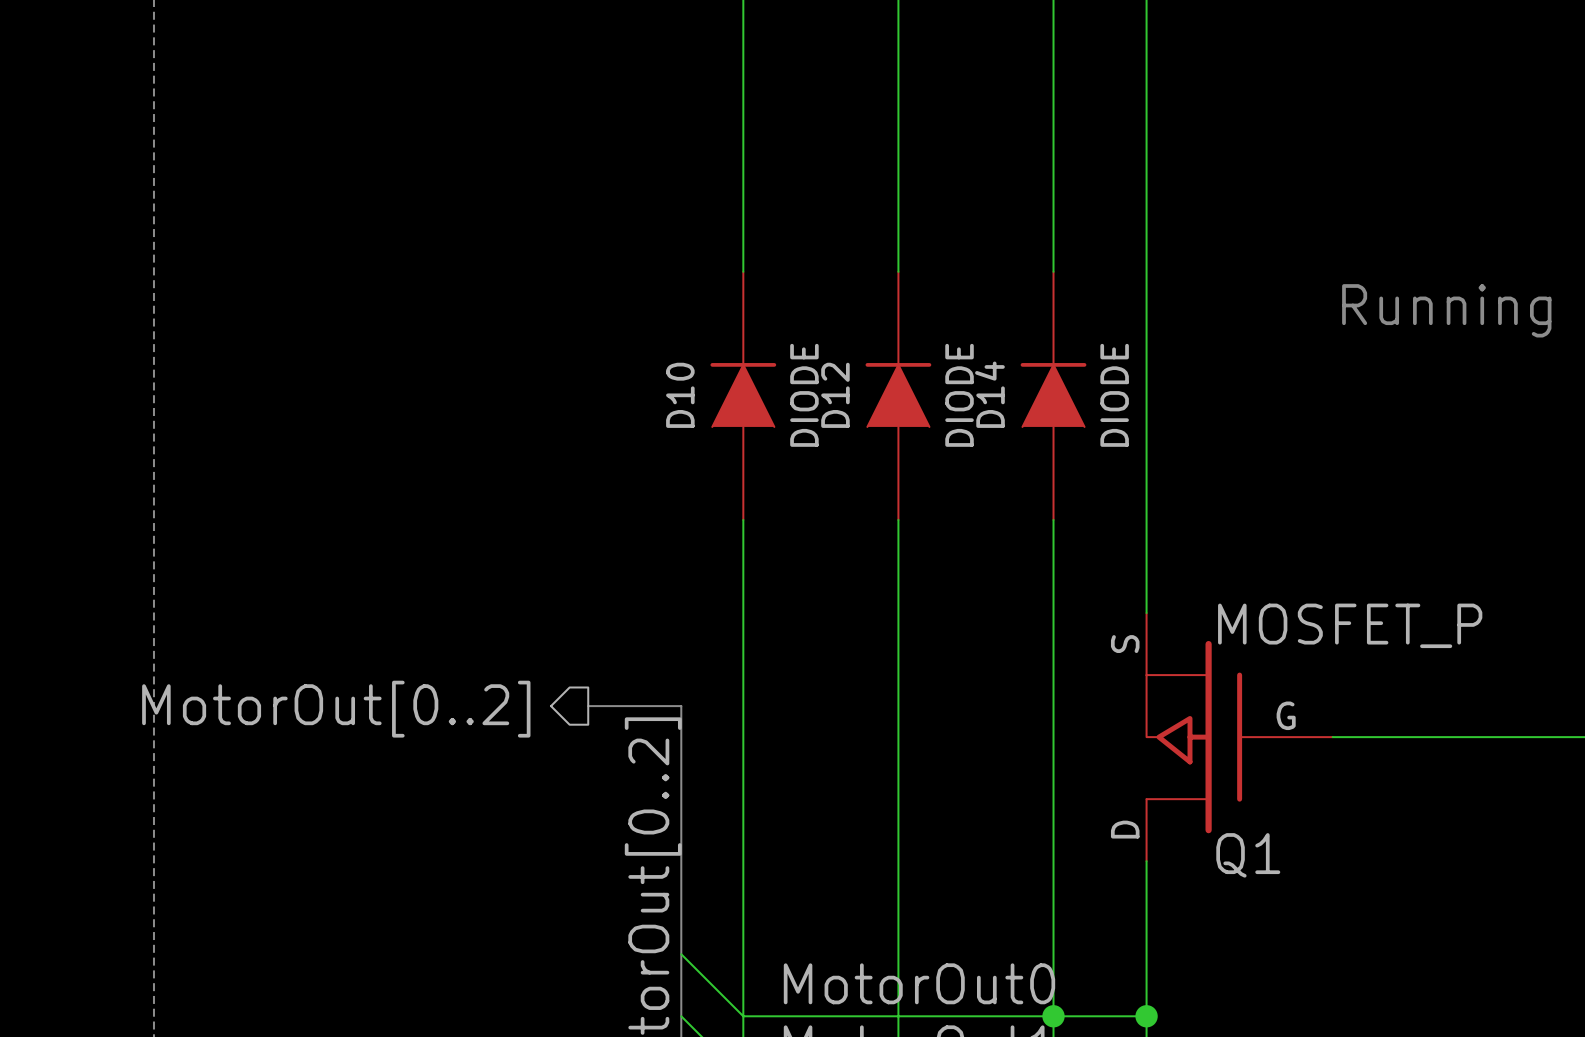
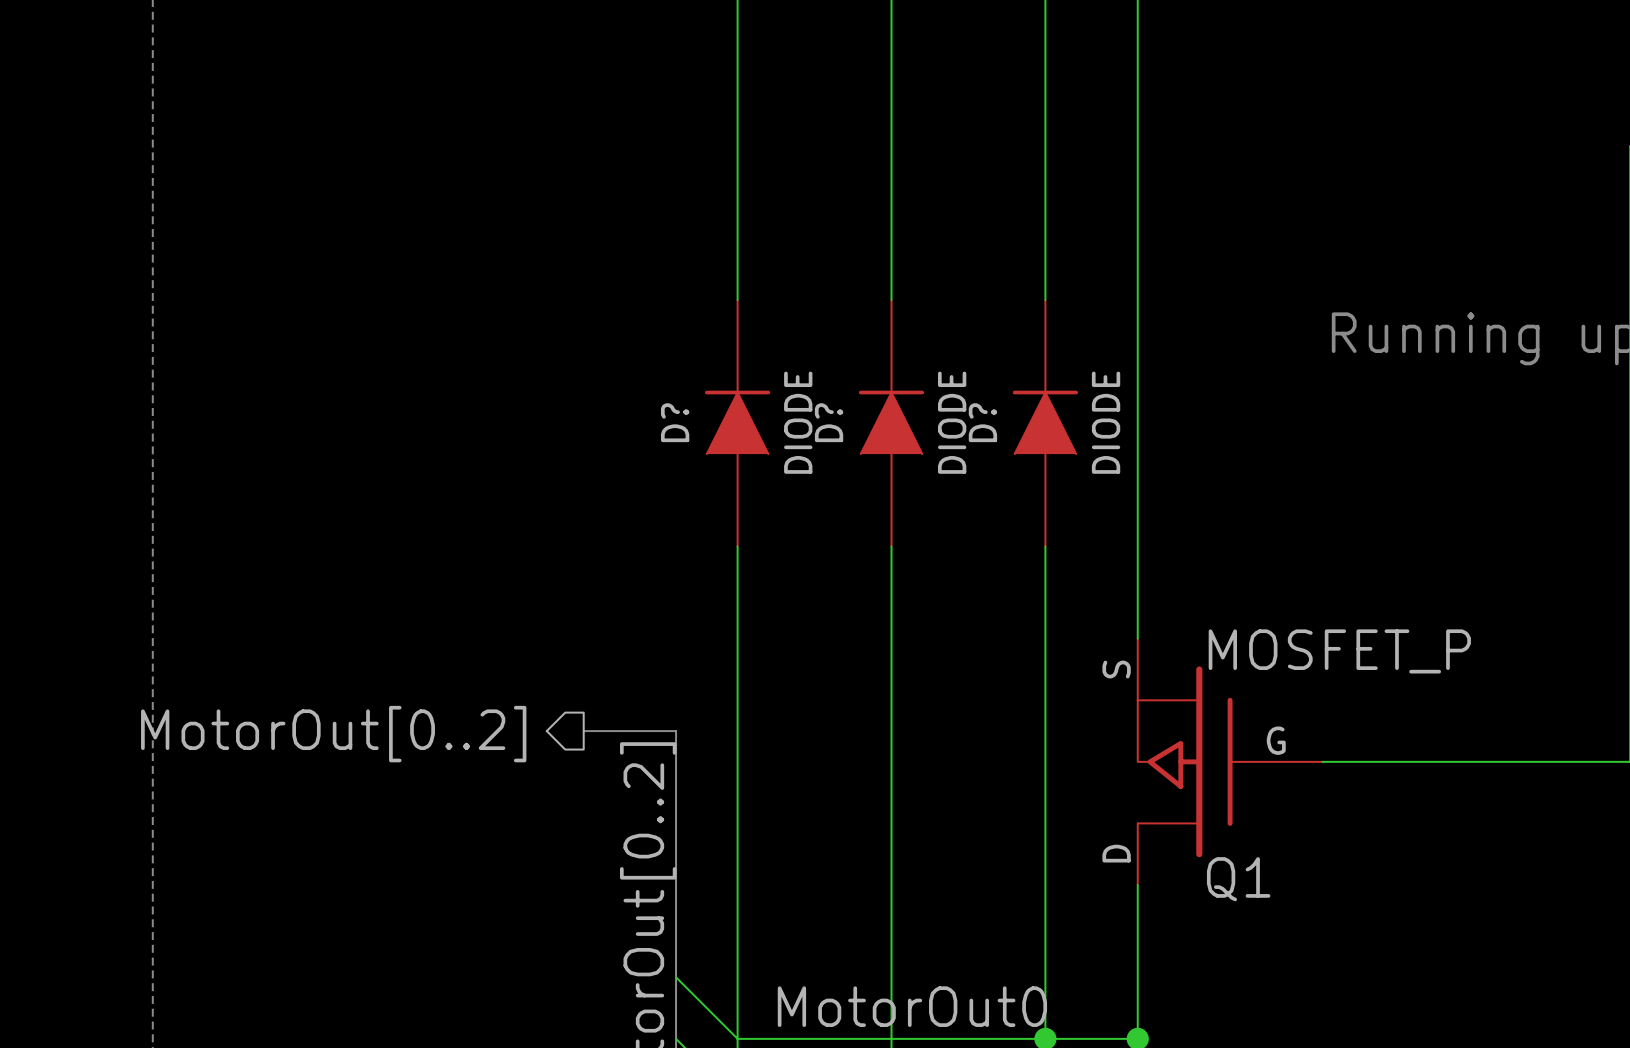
D14 name: D14 (989, 394) -> D? (982, 422)
D10 name: D10 (680, 395) -> D? (675, 422)
D12 name: D12 (835, 395) -> D? (829, 422)

